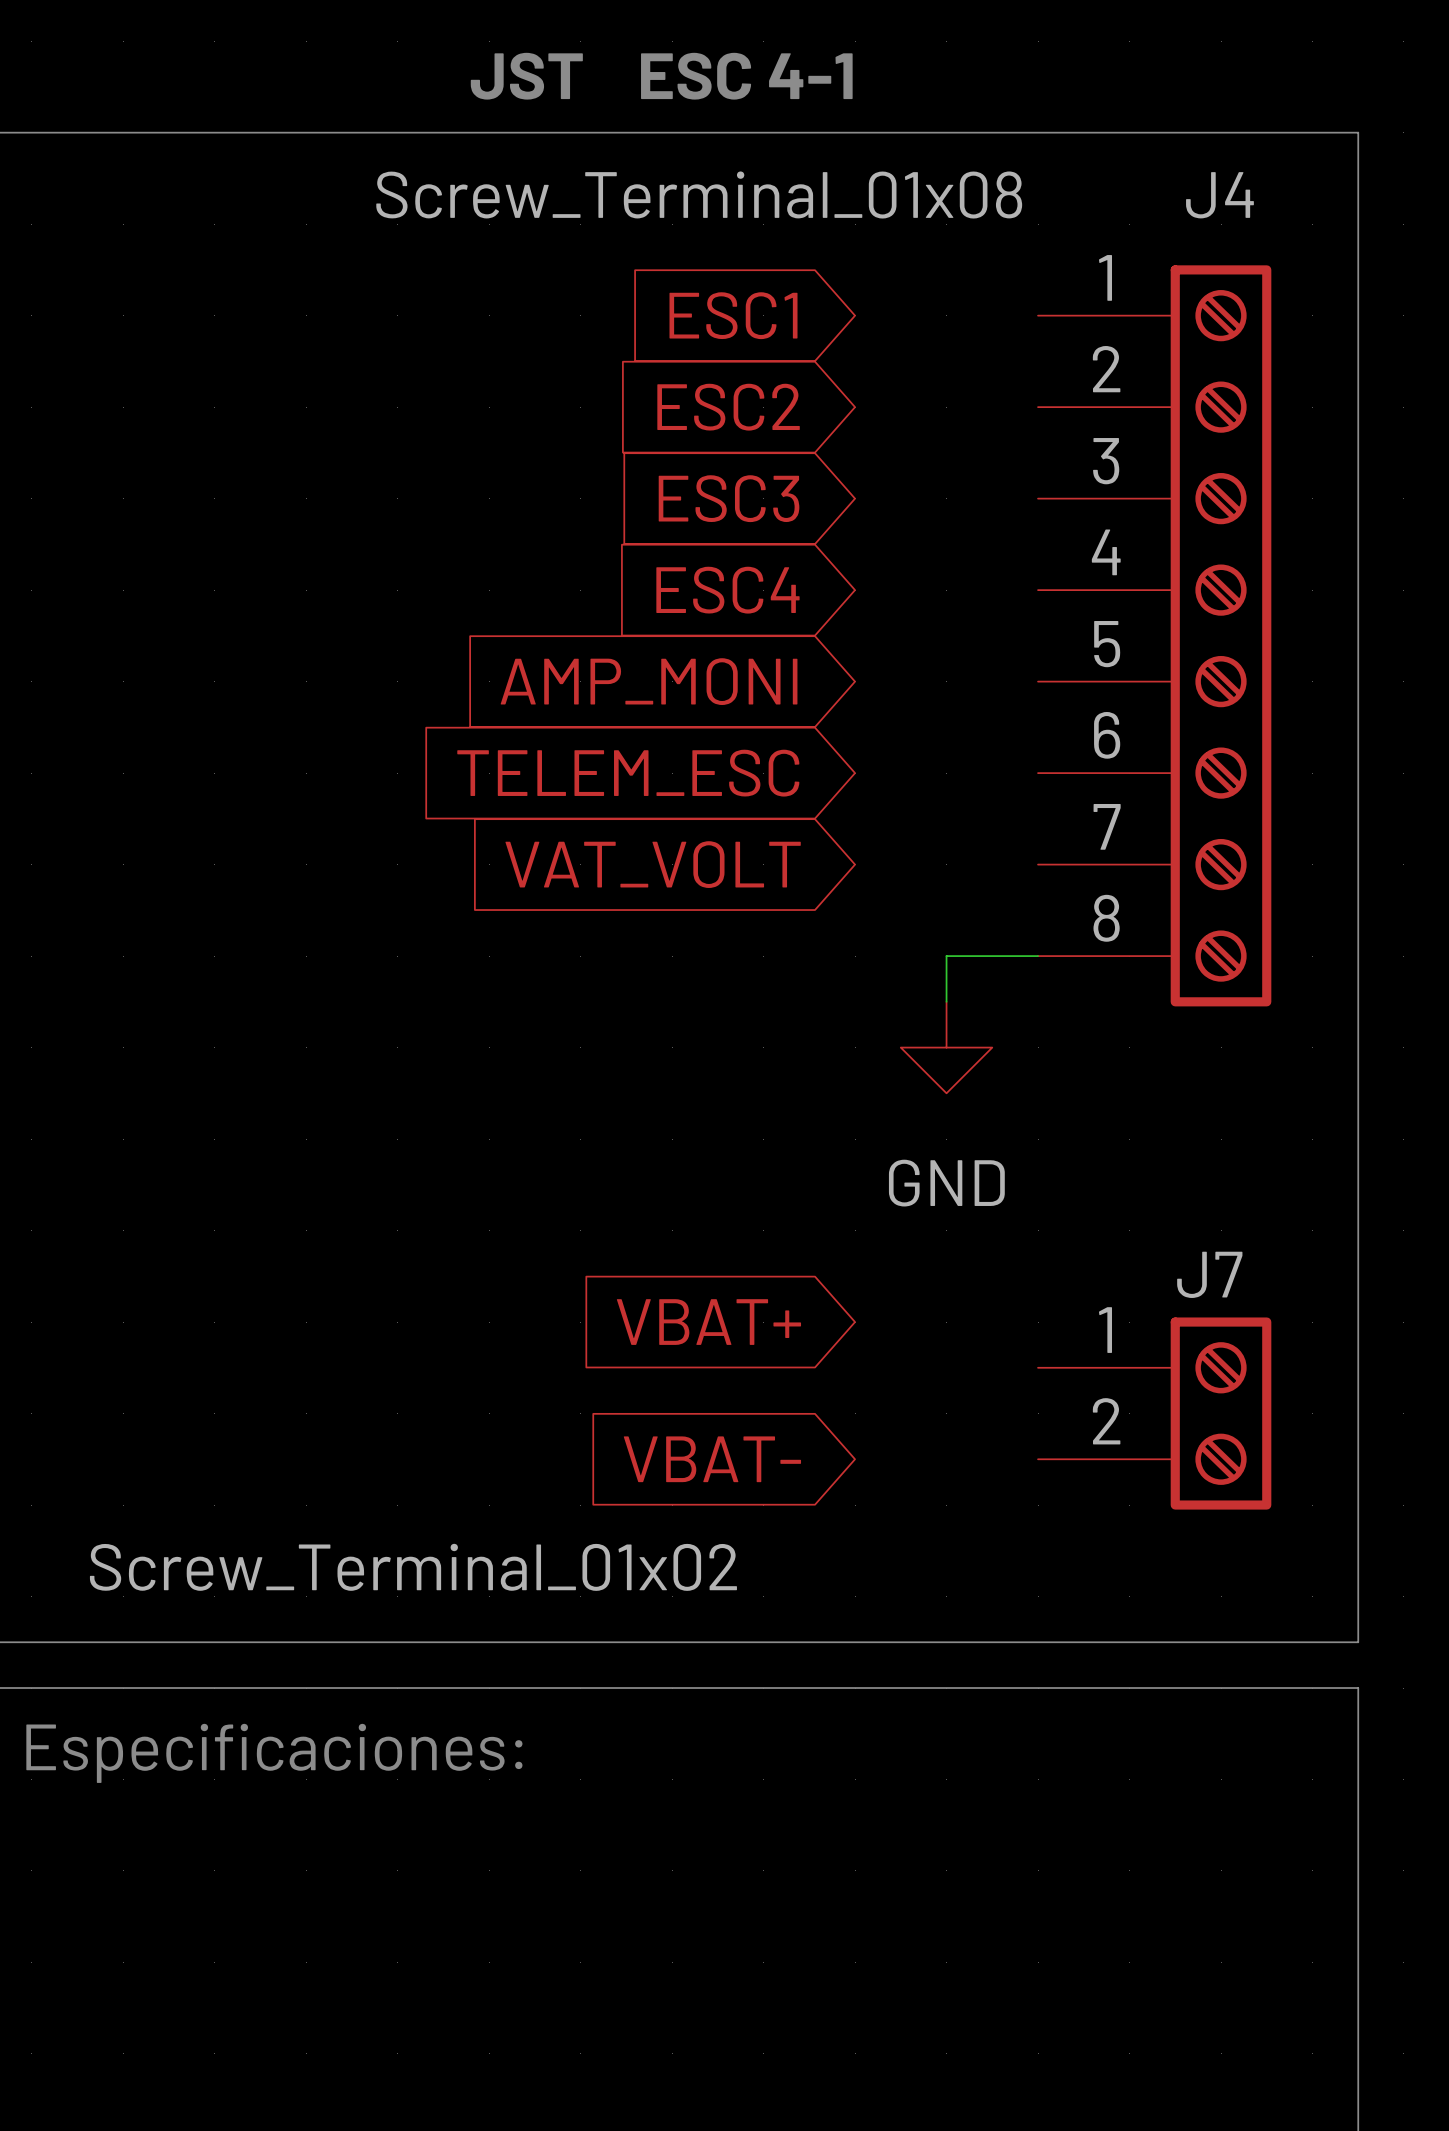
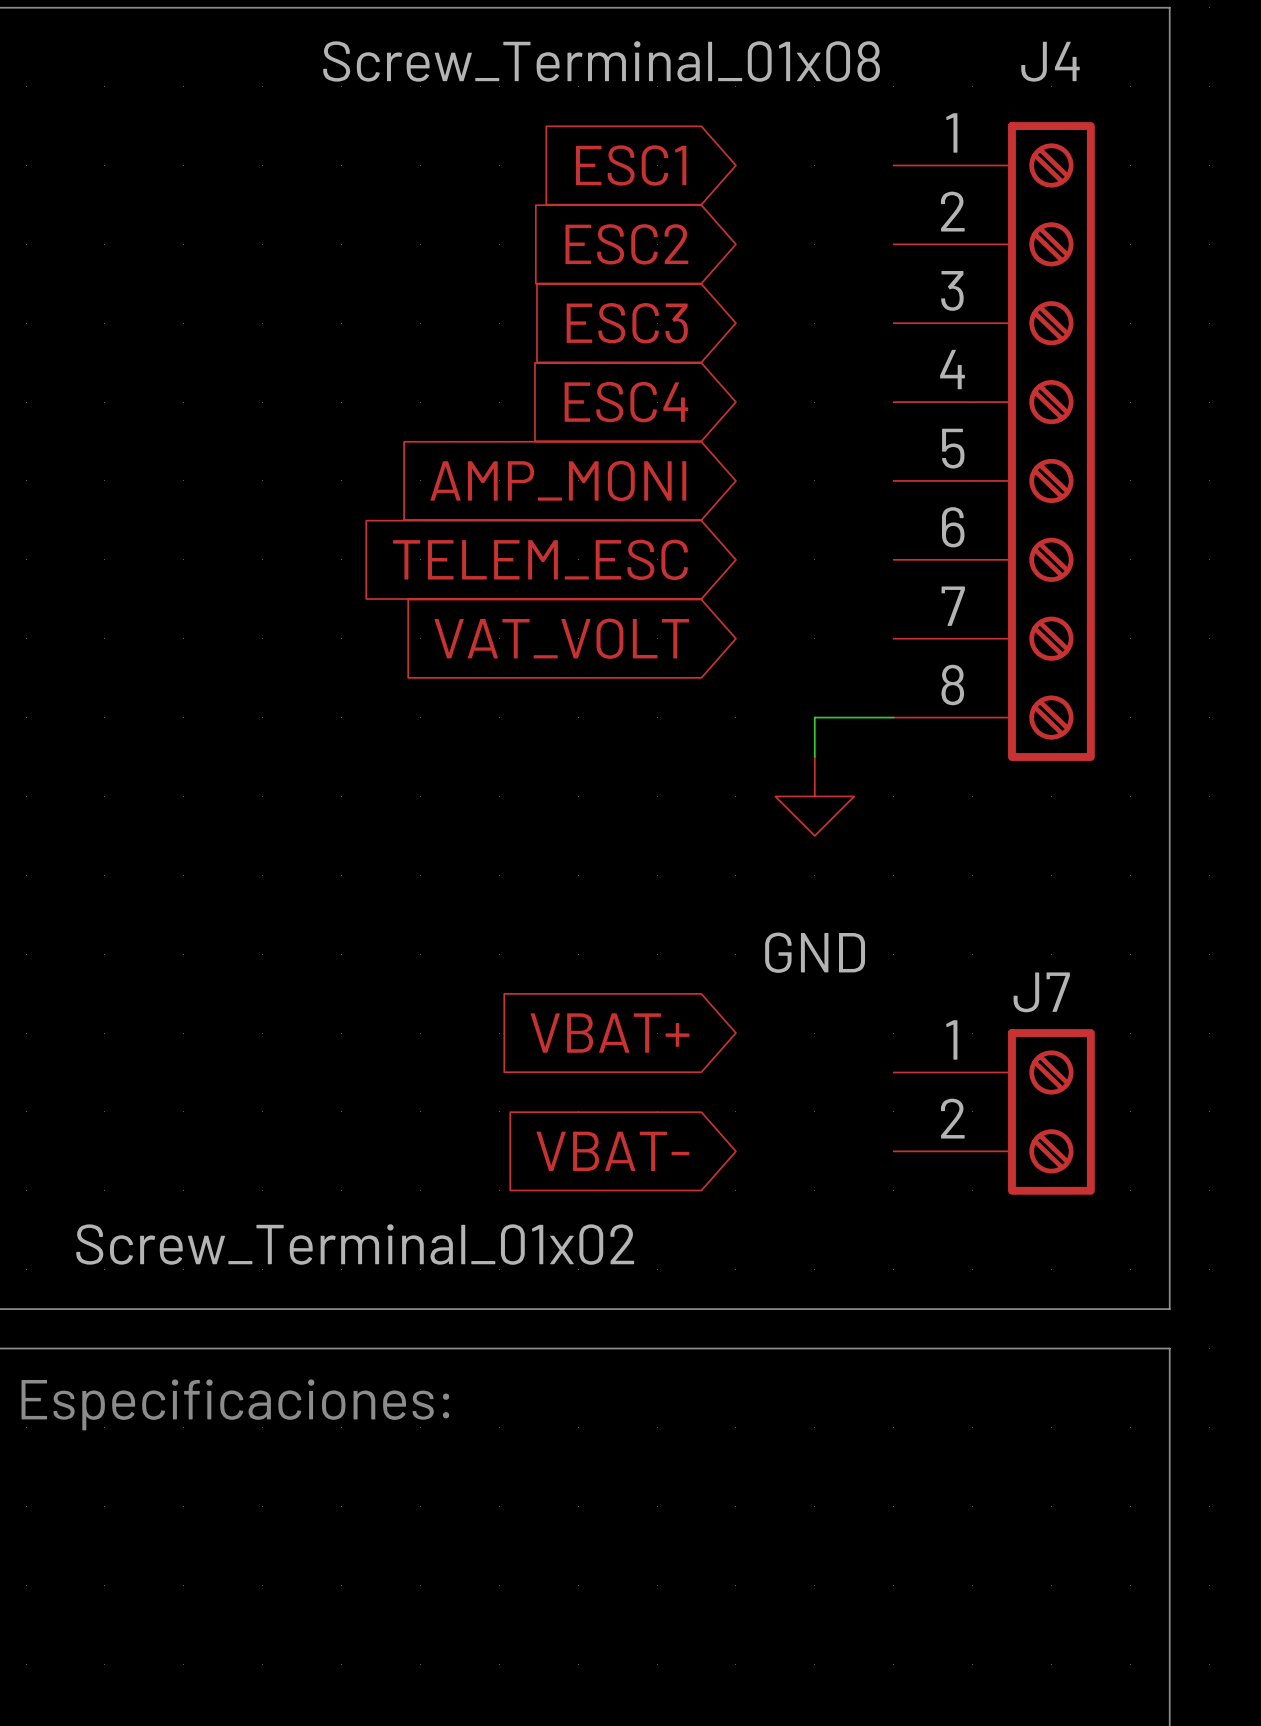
power symbol text position: GND (946, 1183) -> GND (815, 952)

